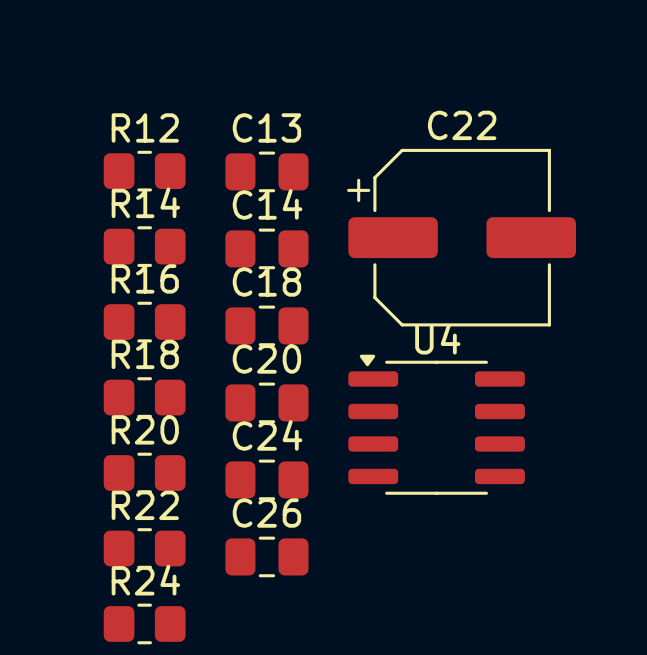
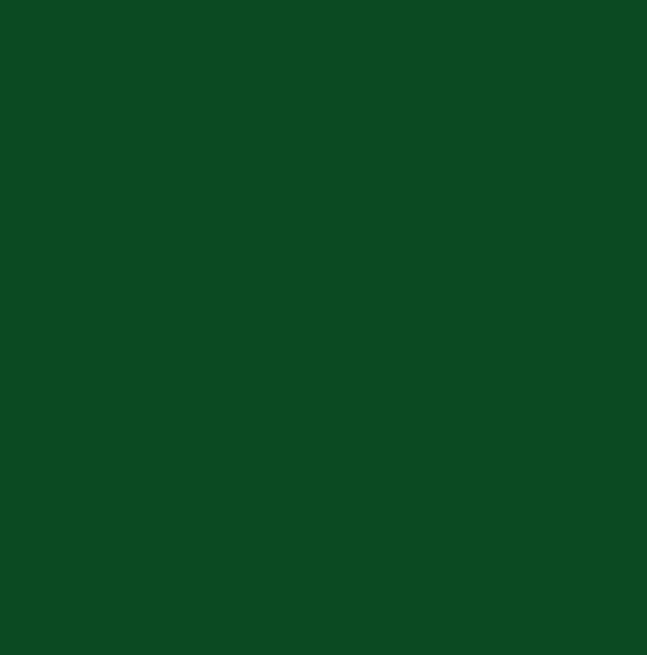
R12: (144, 171) -> none
C13: (266, 171) -> none
C22: (461, 237) -> none
R14: (144, 246) -> none
C14: (266, 248) -> none
R16: (144, 322) -> none
C18: (266, 325) -> none
R18: (144, 397) -> none
C20: (266, 402) -> none
U4: (436, 424) -> none
R20: (144, 473) -> none
C24: (266, 479) -> none
R22: (144, 548) -> none
C26: (266, 556) -> none
R24: (144, 623) -> none

